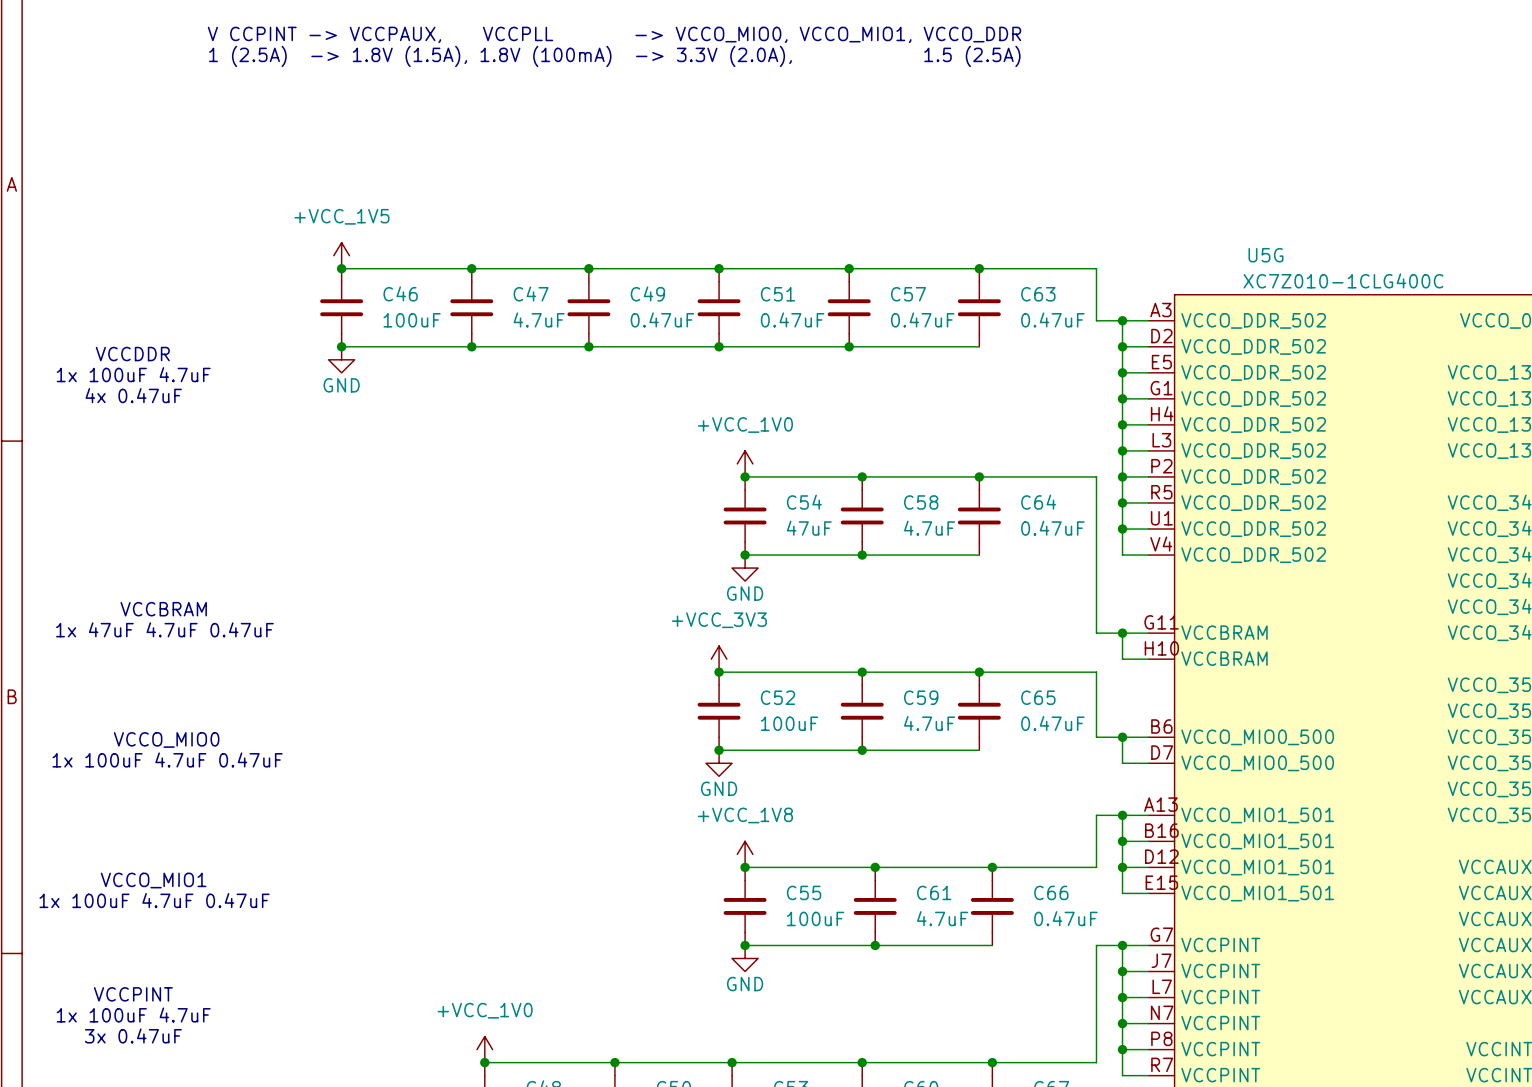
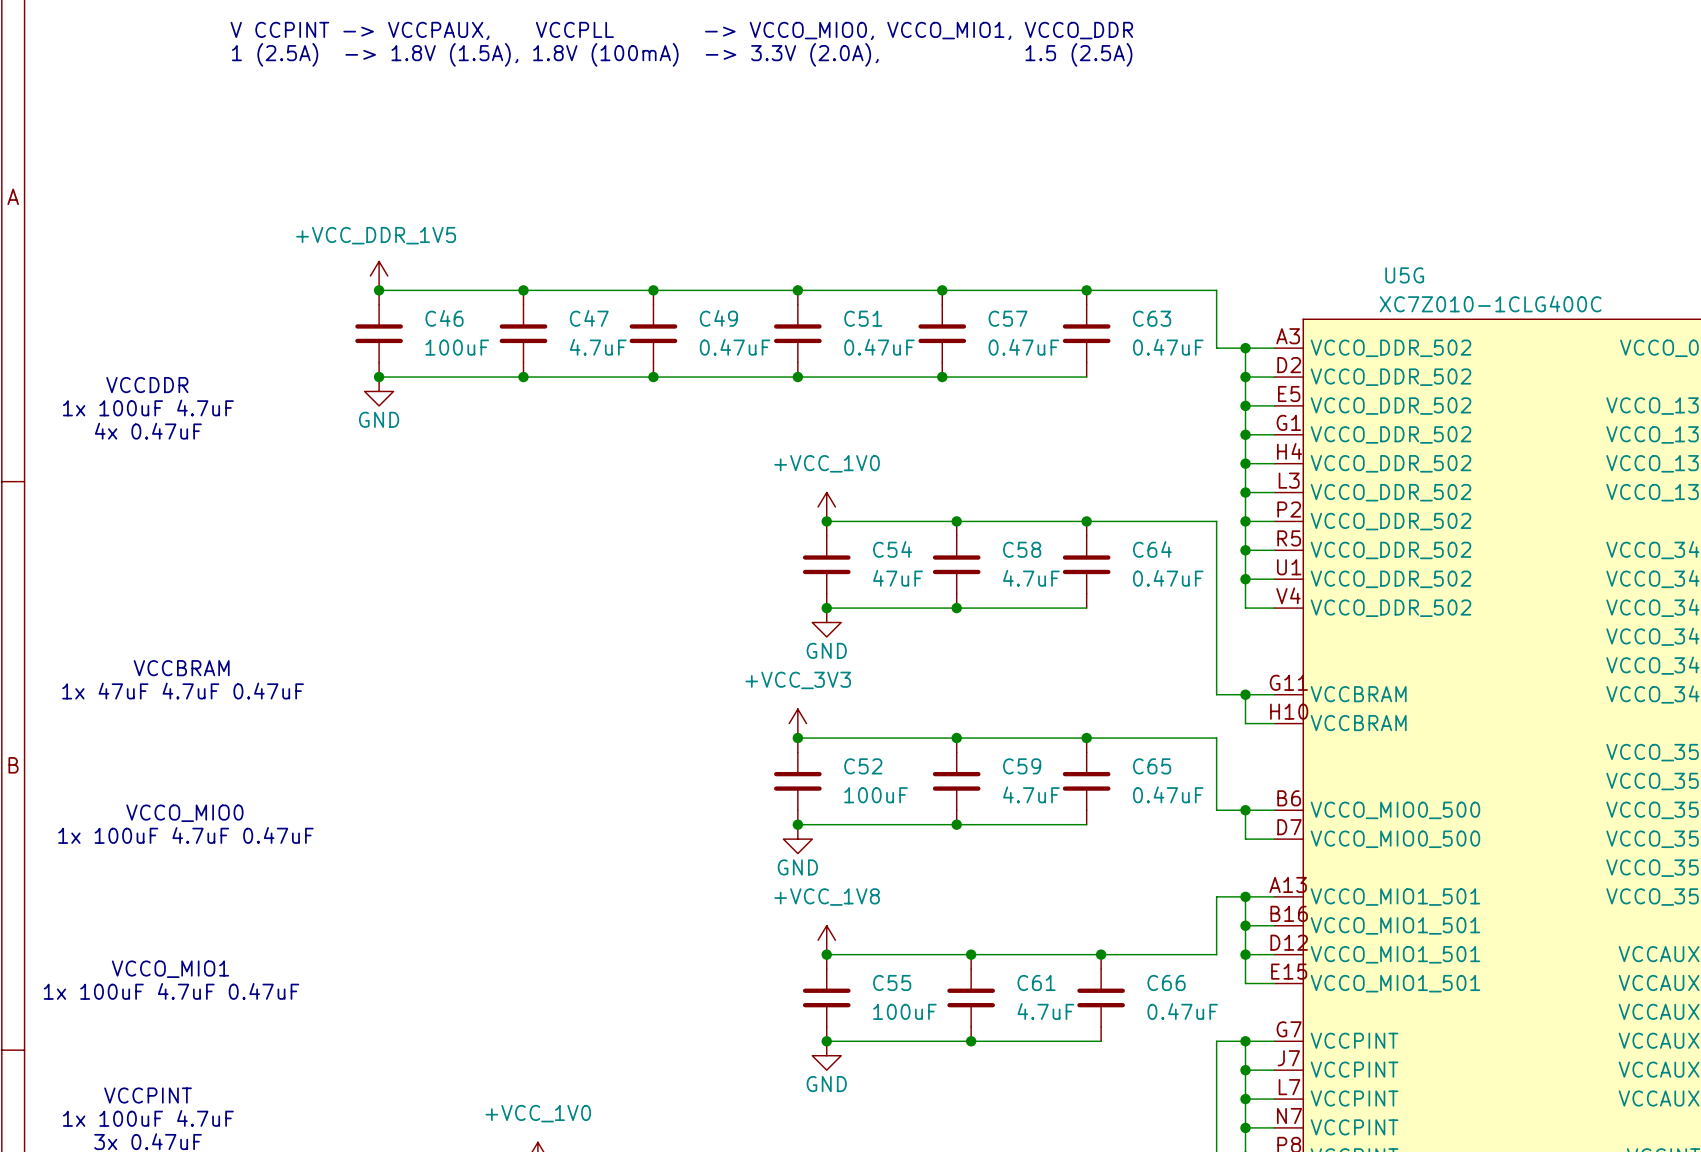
power symbol: +VCC_1V5 (341, 255) -> +VCC_DDR_1V5 (379, 275)

